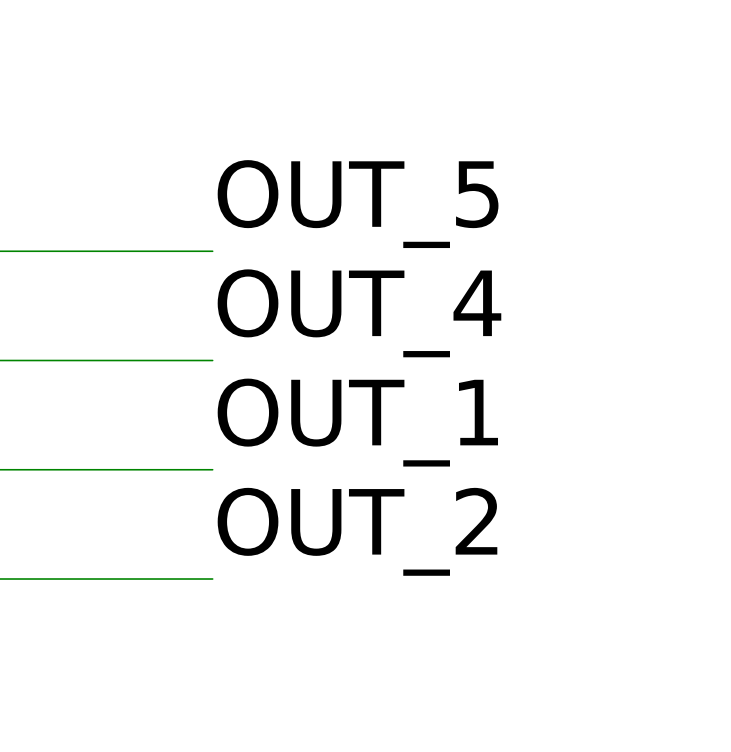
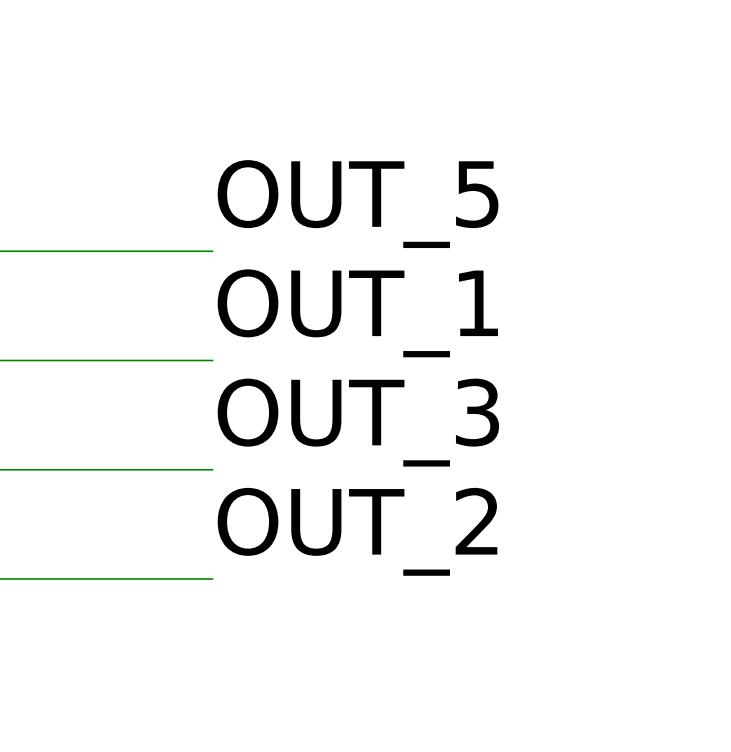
label: OUT_4 (359, 313) -> OUT_1 (357, 313)
label: OUT_1 (357, 422) -> OUT_3 (358, 422)

